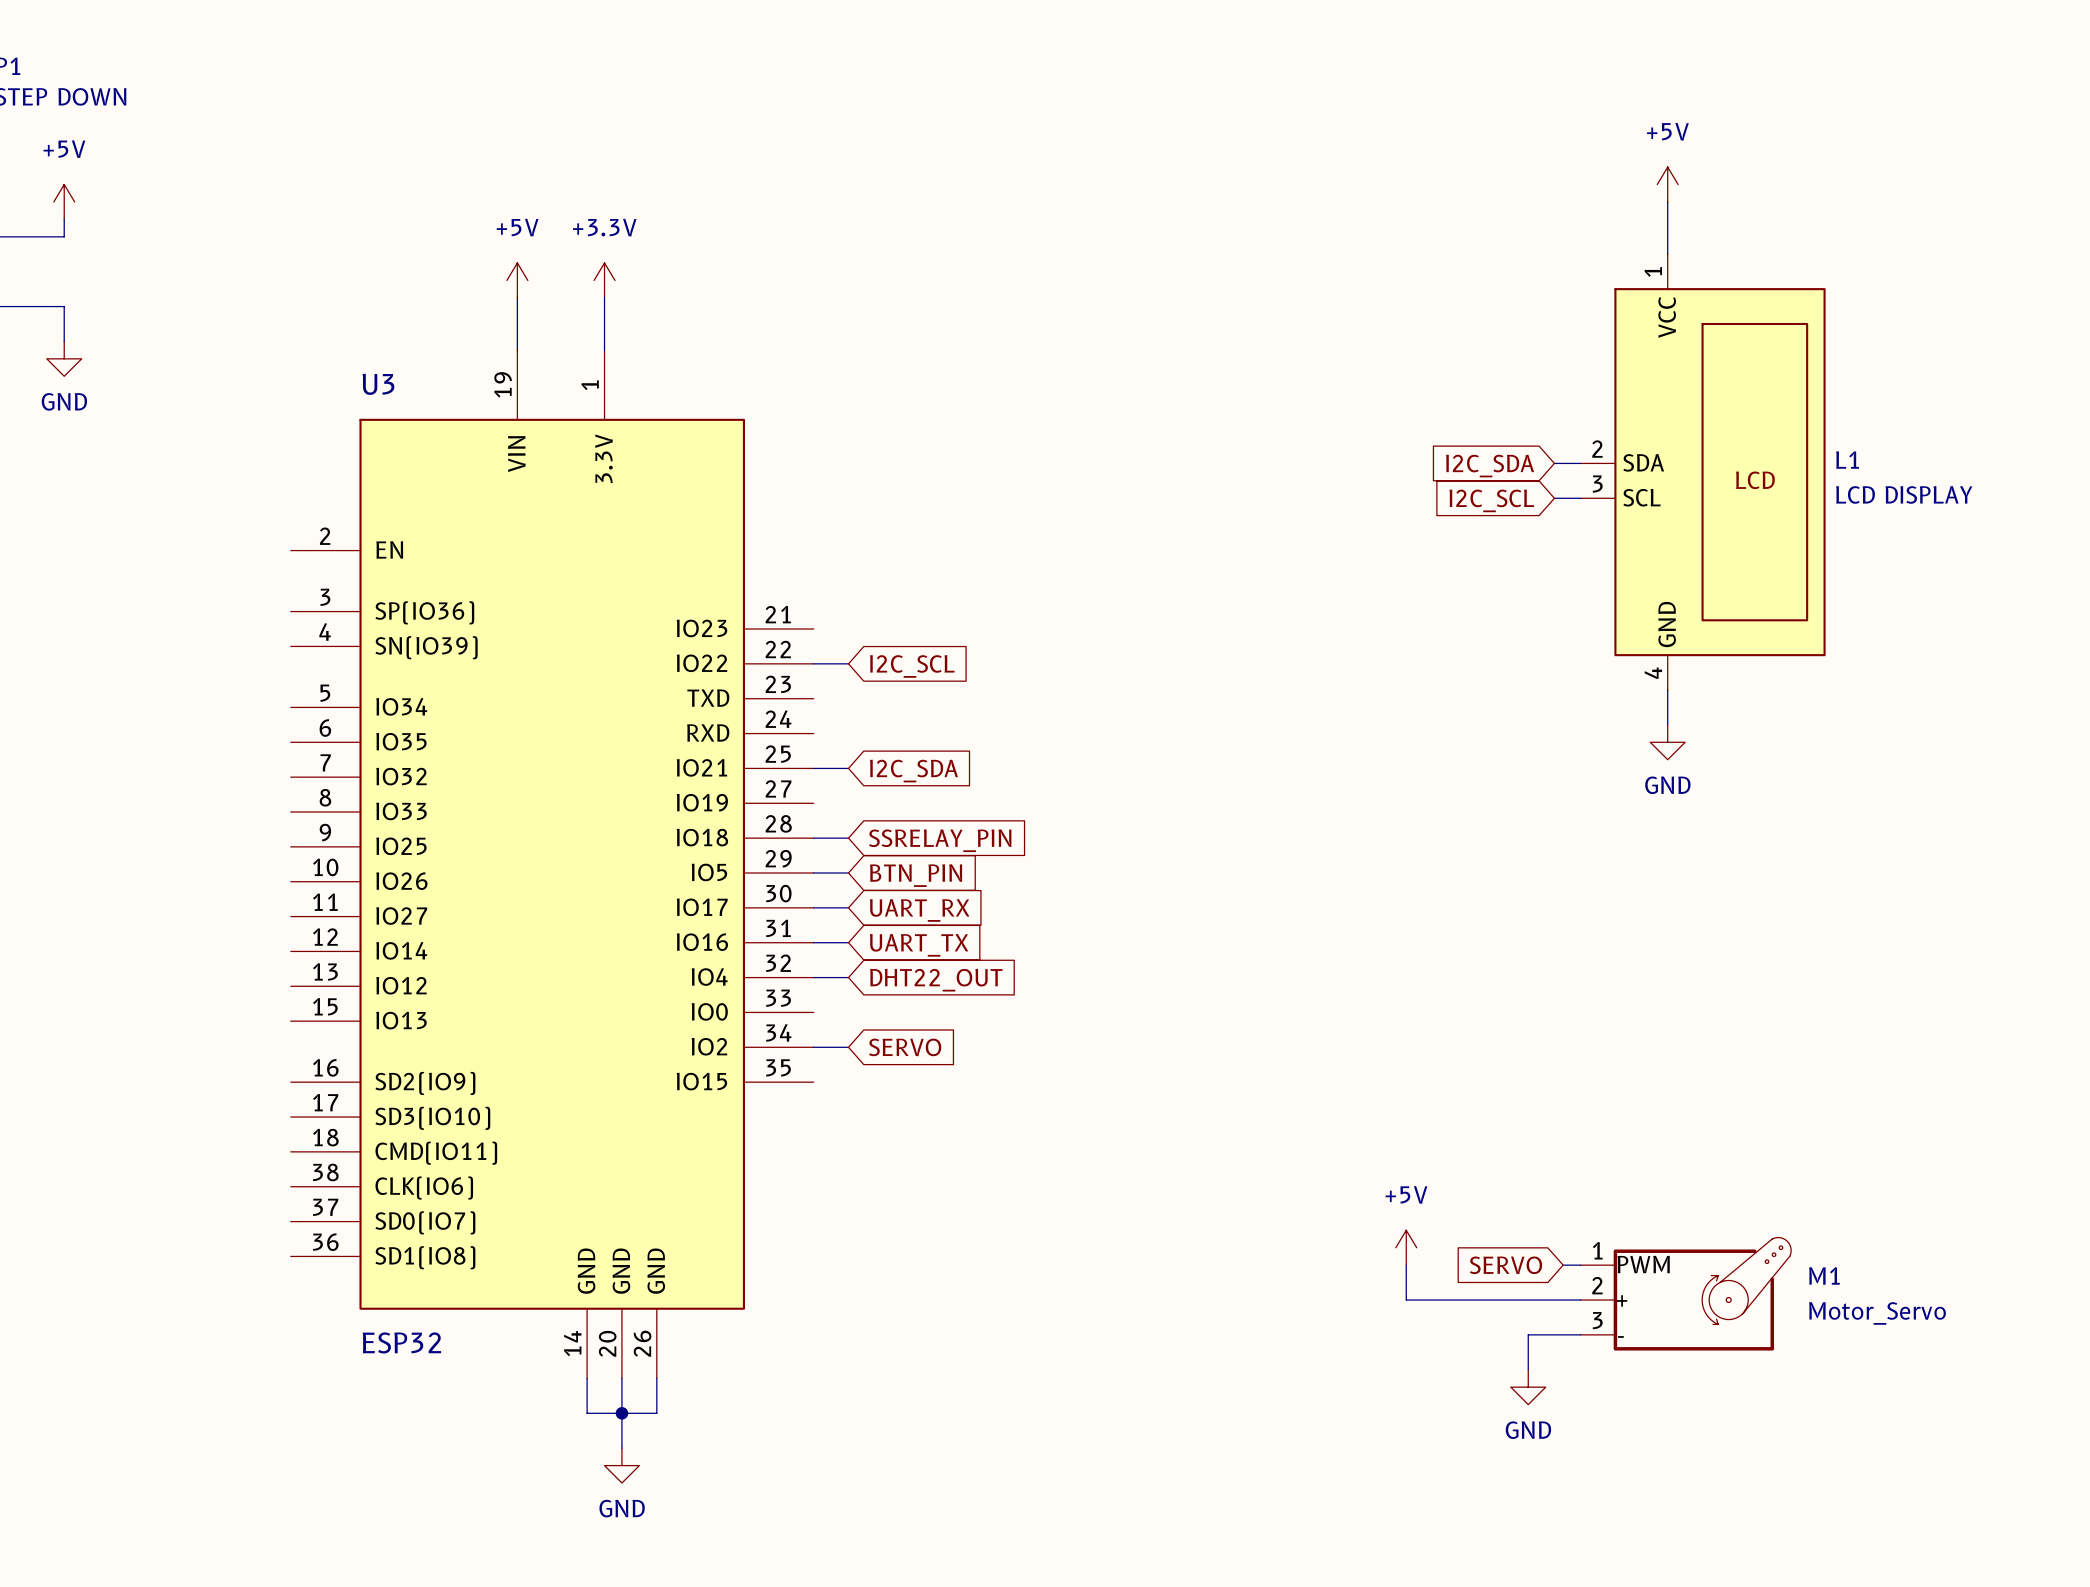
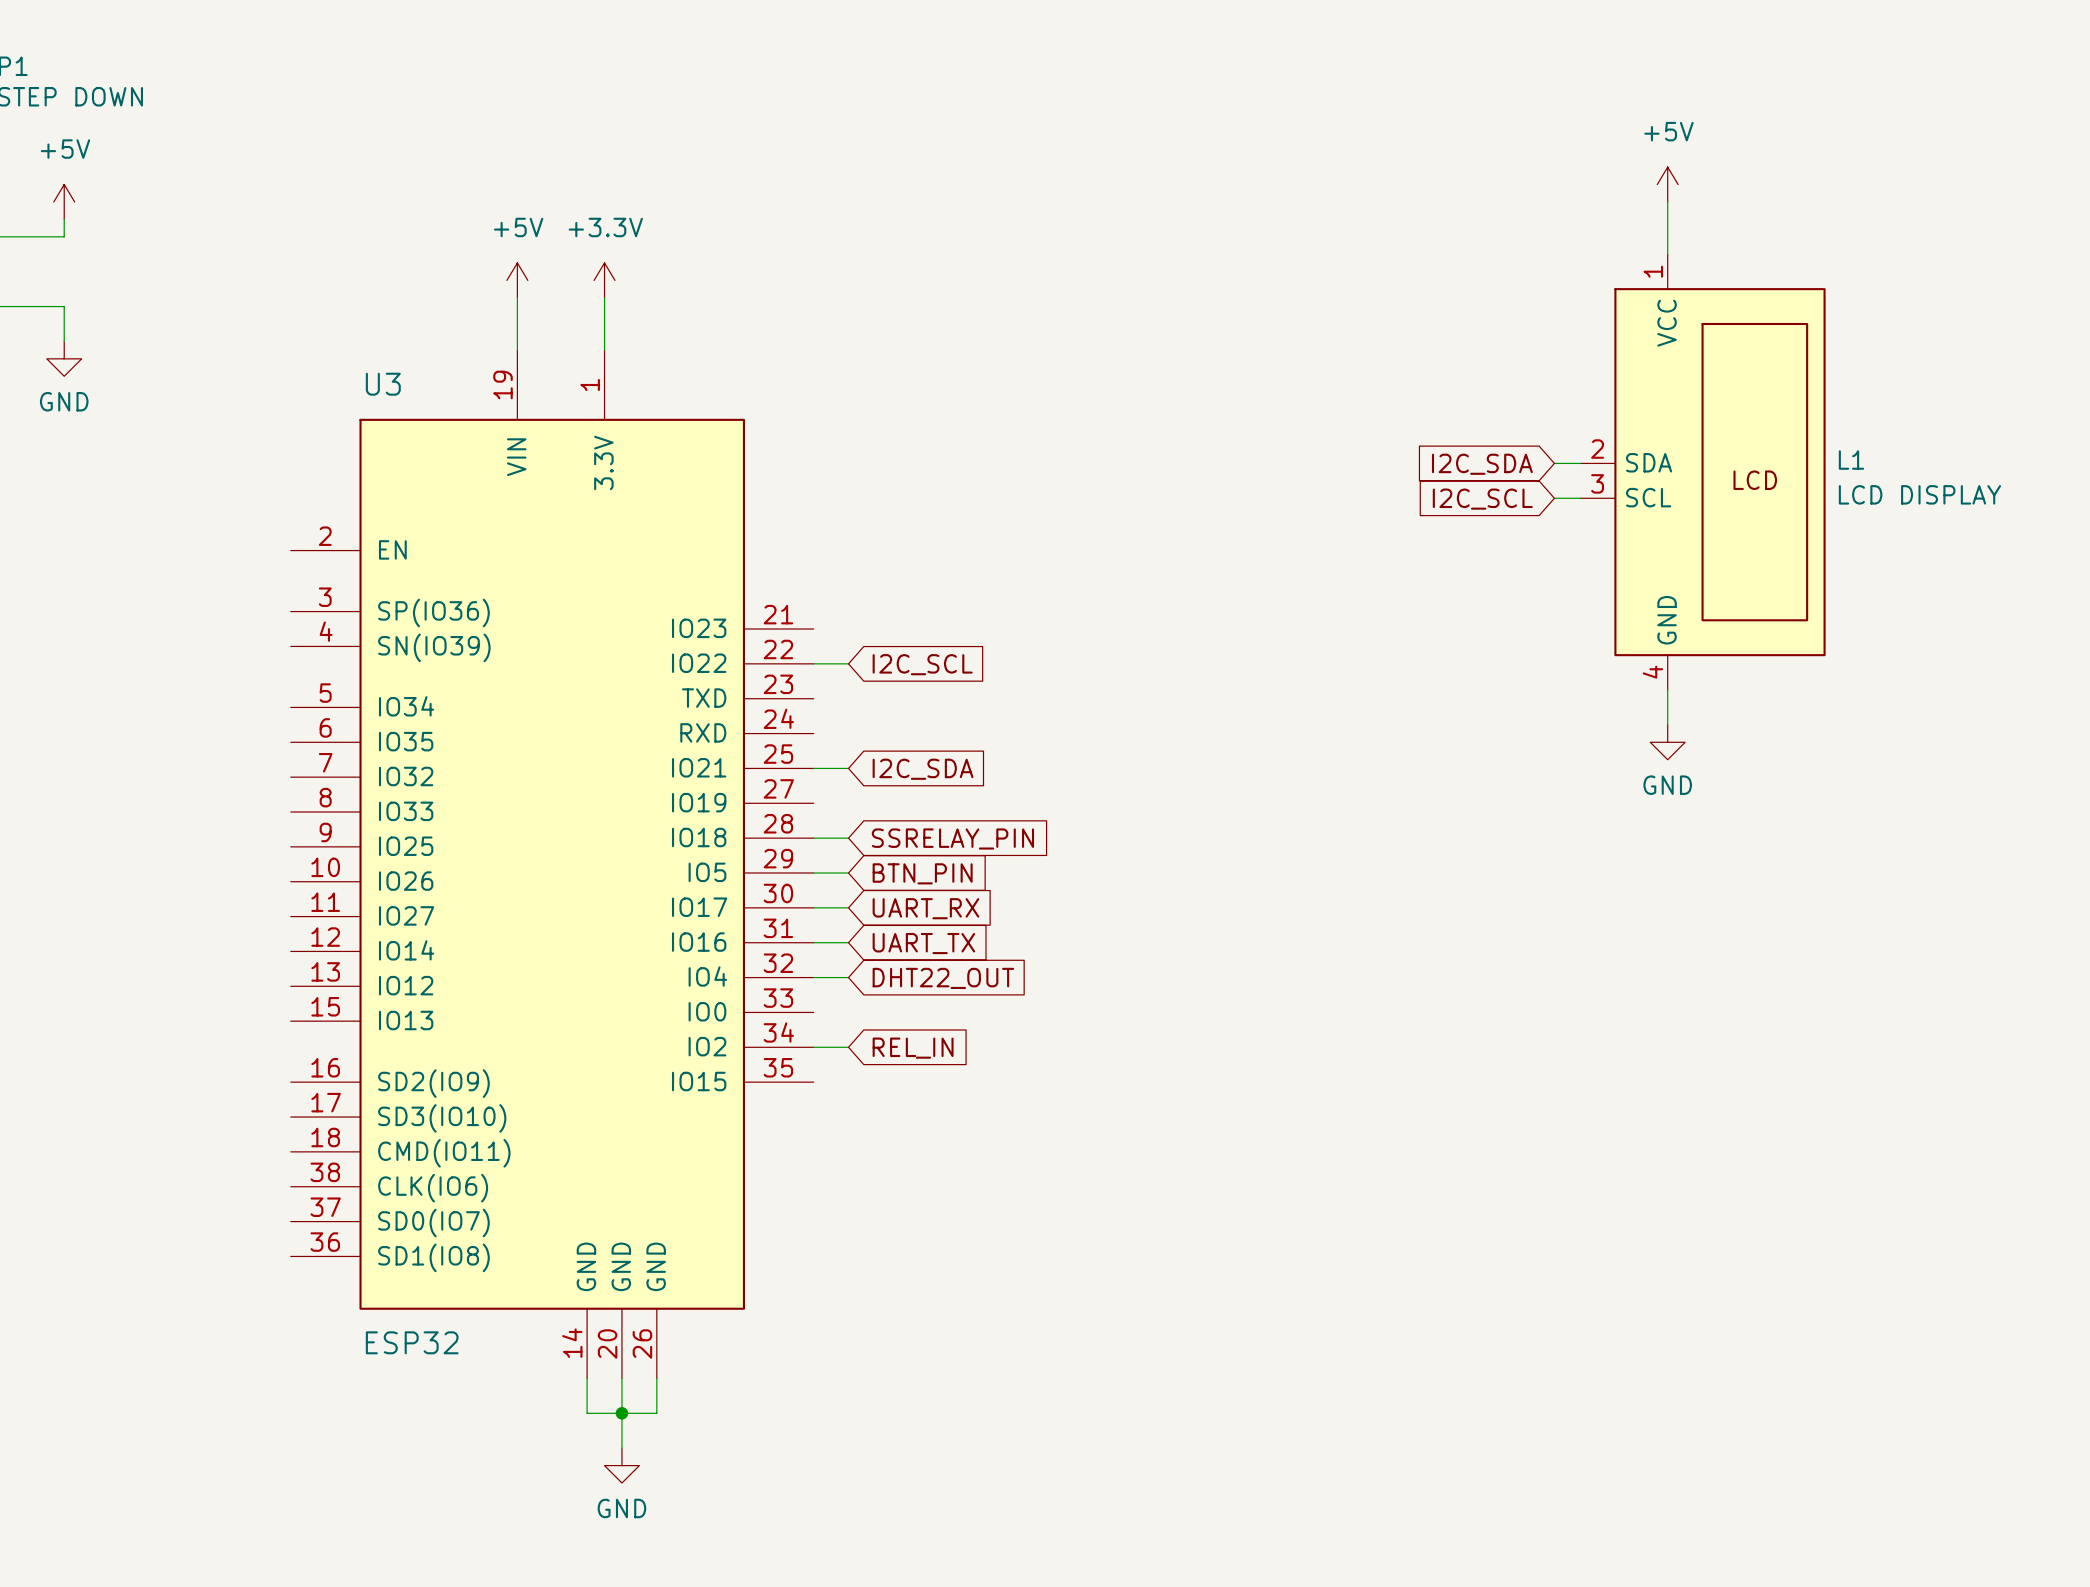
global label: SERVO (905, 1047) -> REL_IN (913, 1048)
power symbol: +5V (1406, 1247) -> none
wire: (1406, 1265) (1406, 1300) (1580, 1300) -> none
global label: SERVO (1506, 1265) -> none
wire: (1563, 1265) (1580, 1265) -> none
M1: Motor_Servo (1685, 1294) -> none
wire: (1580, 1334) (1528, 1334) (1528, 1369) -> none
power symbol: GND (1528, 1387) -> none

